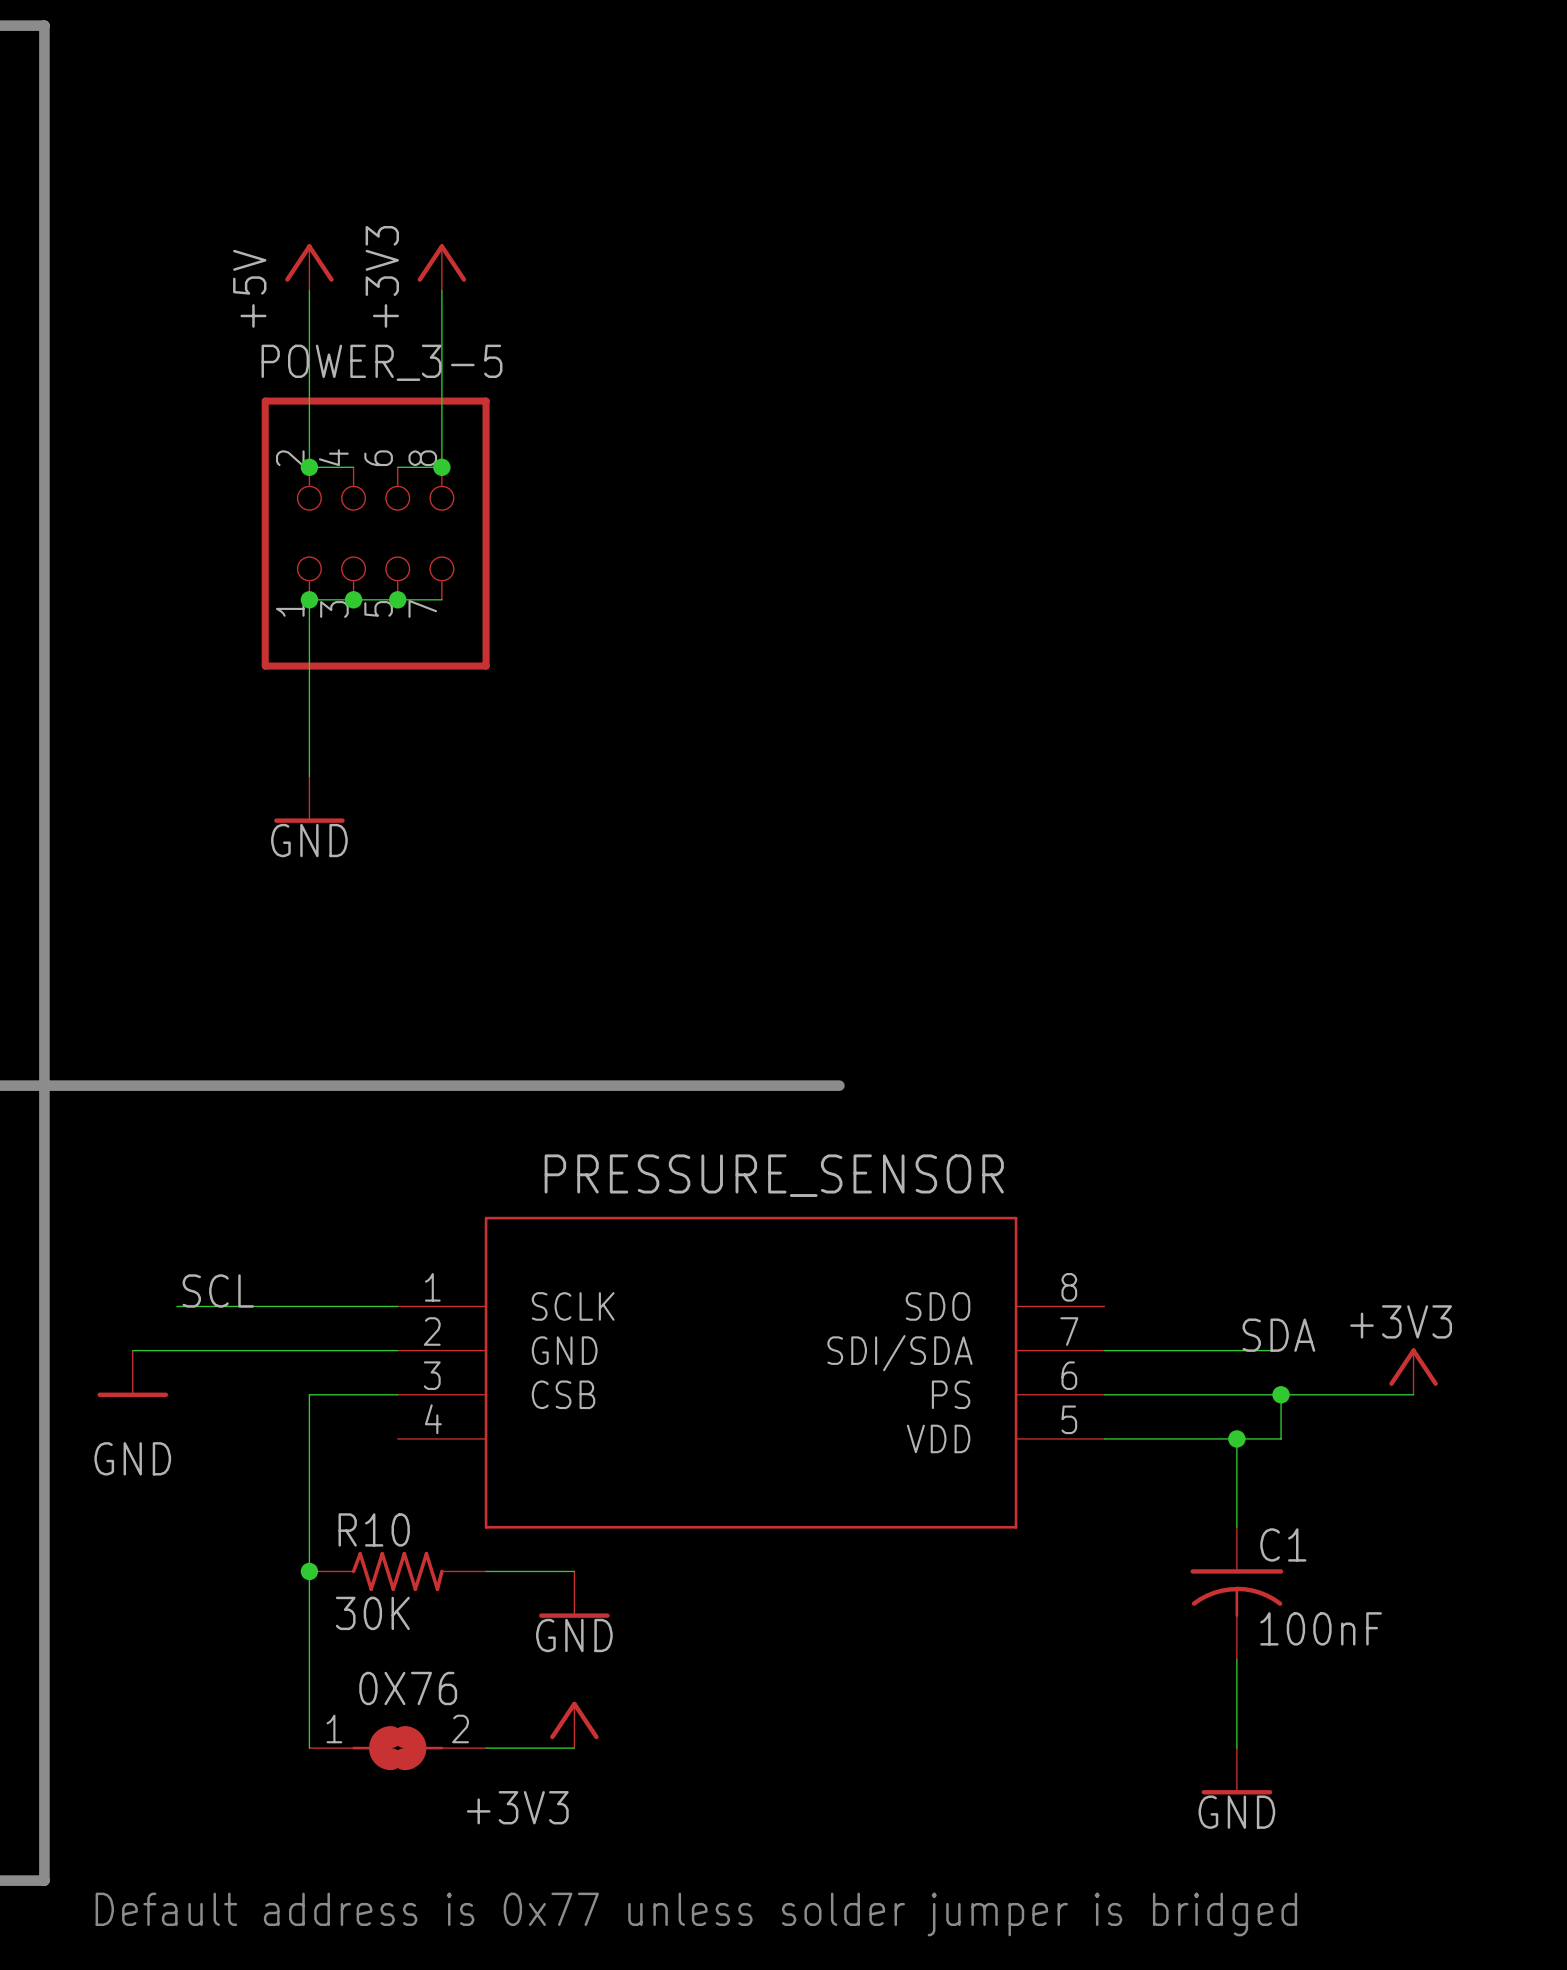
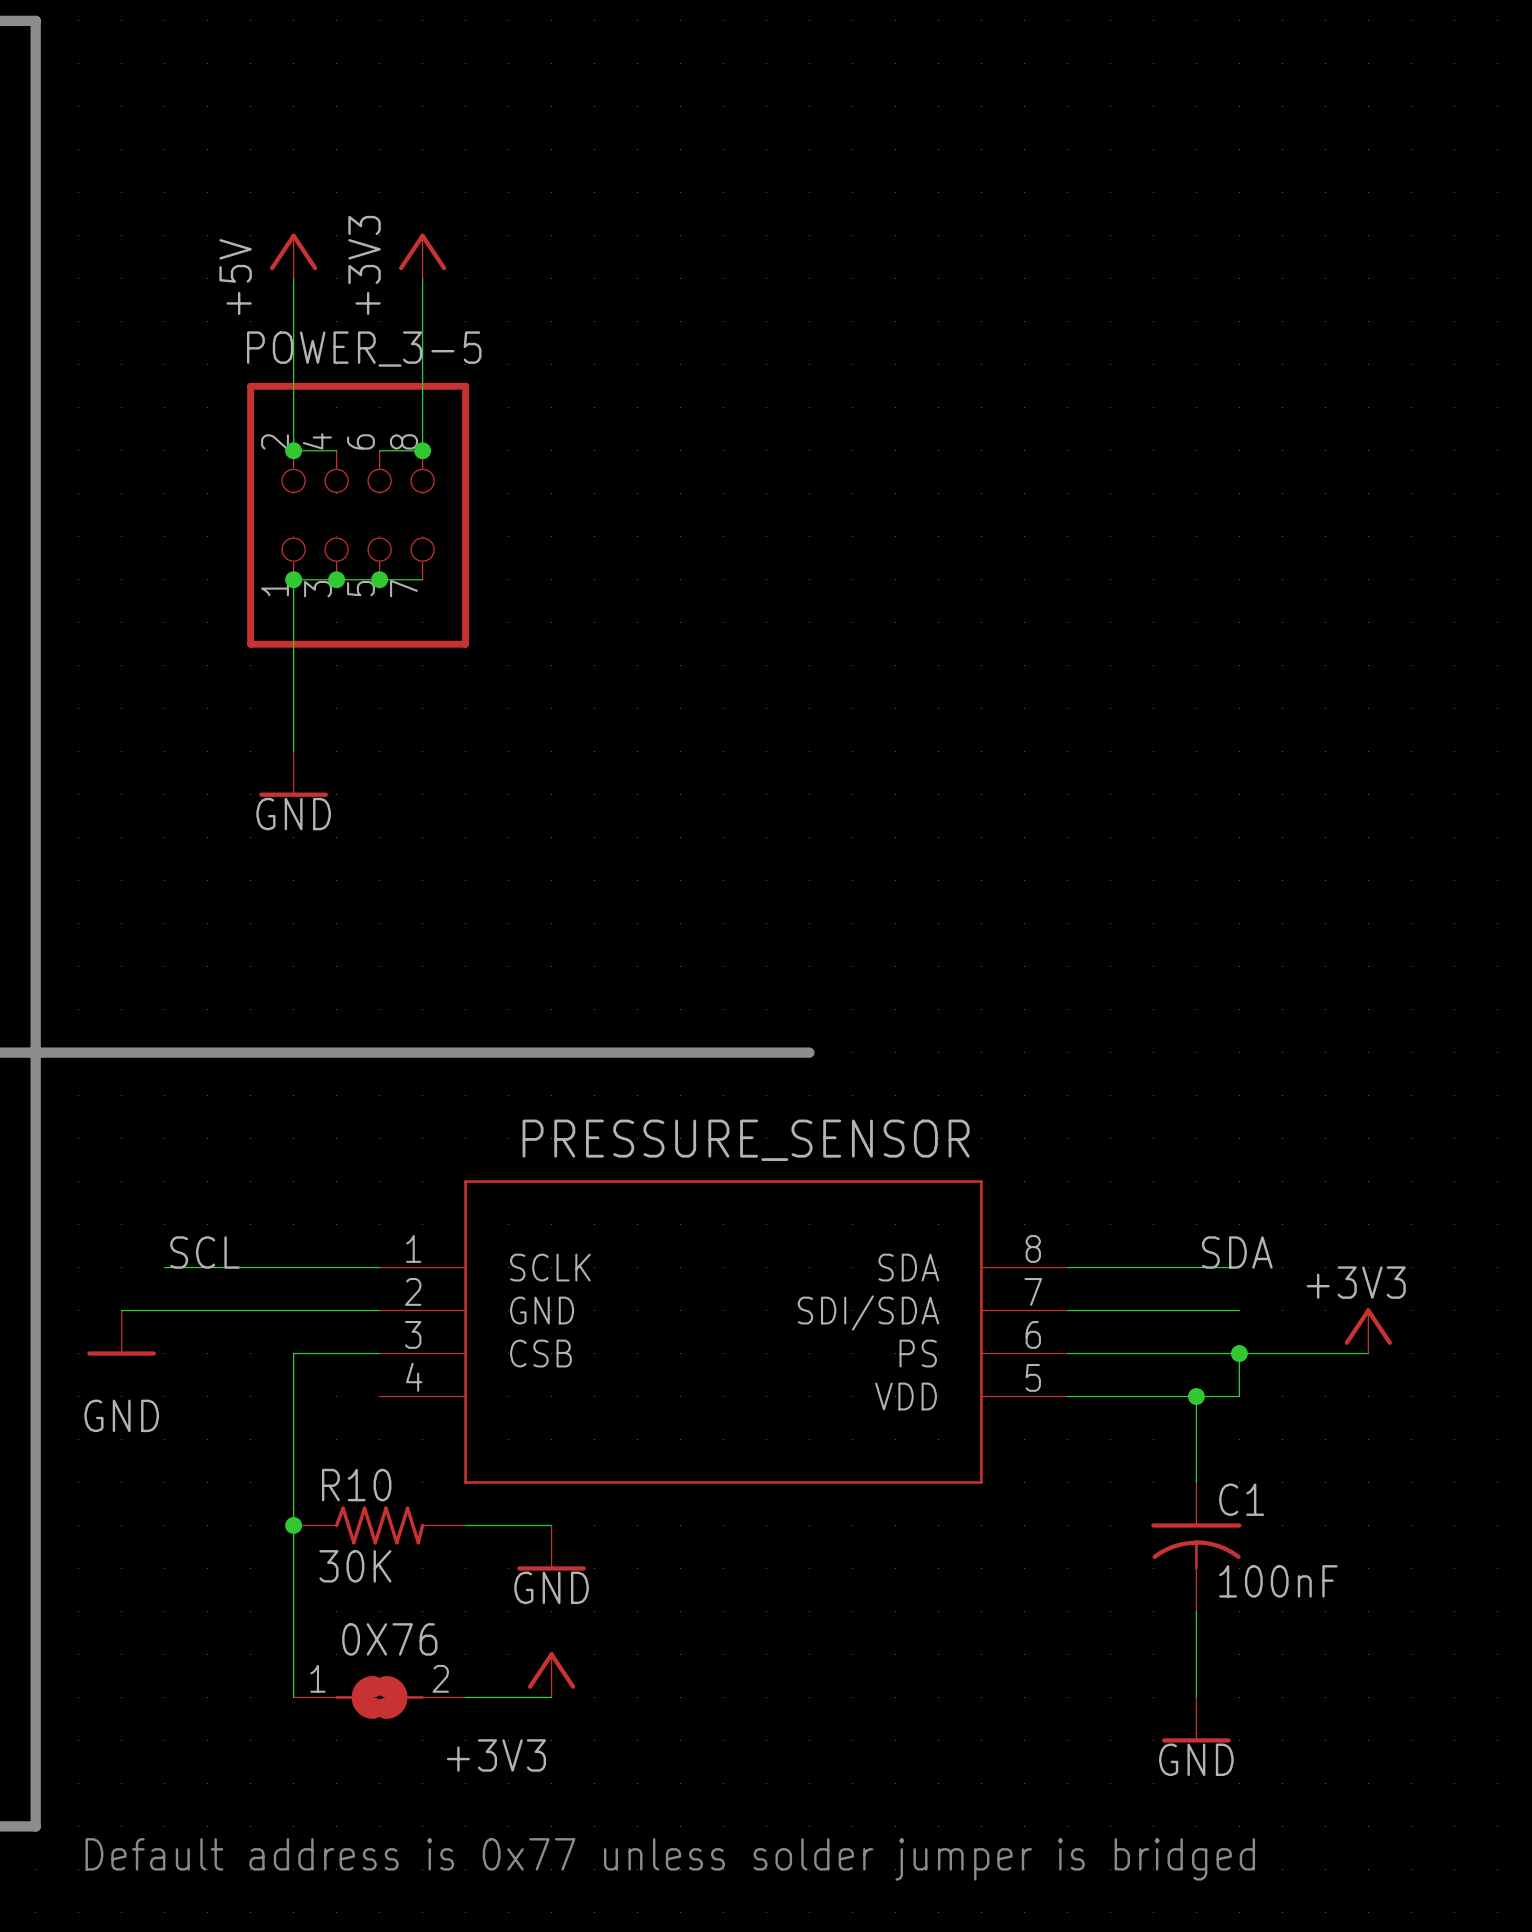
PRESSURE_SENSOR pin name: SDO (938, 1306) -> SDA (908, 1267)
wire: none -> (1067, 1267) (1239, 1267)
label position: SDA (1278, 1335) -> SDA (1237, 1252)

